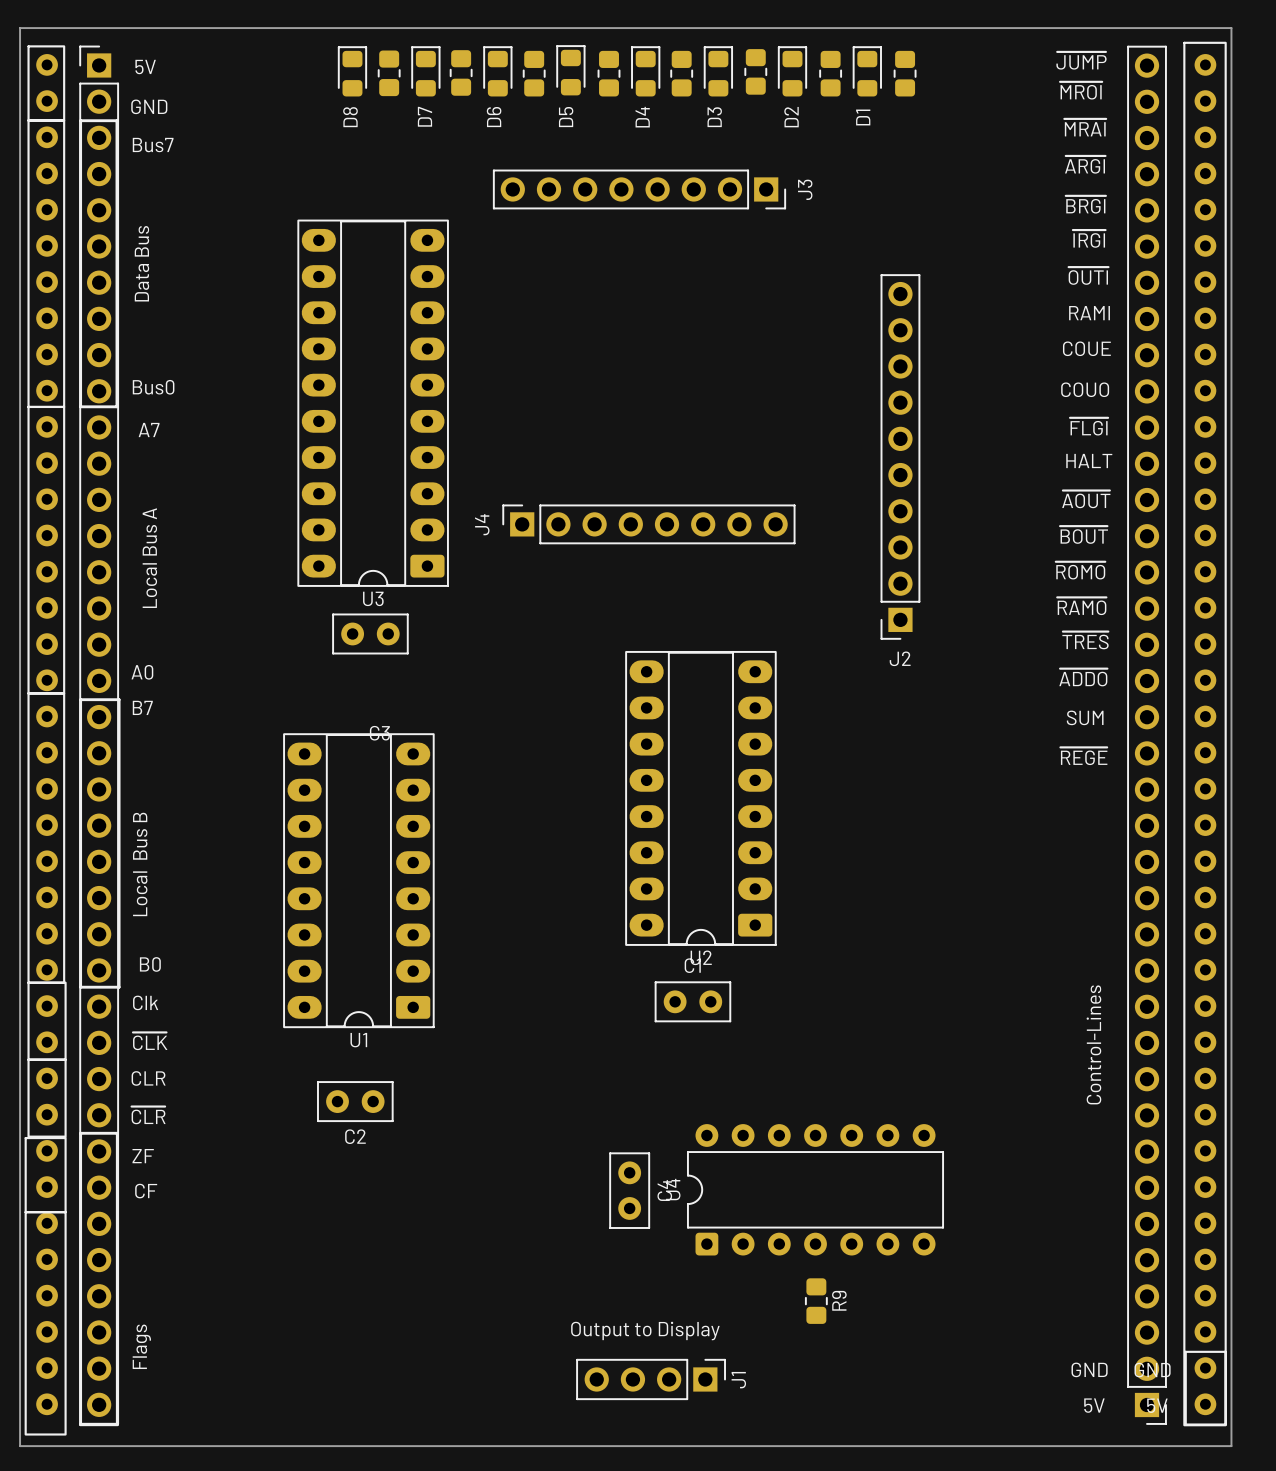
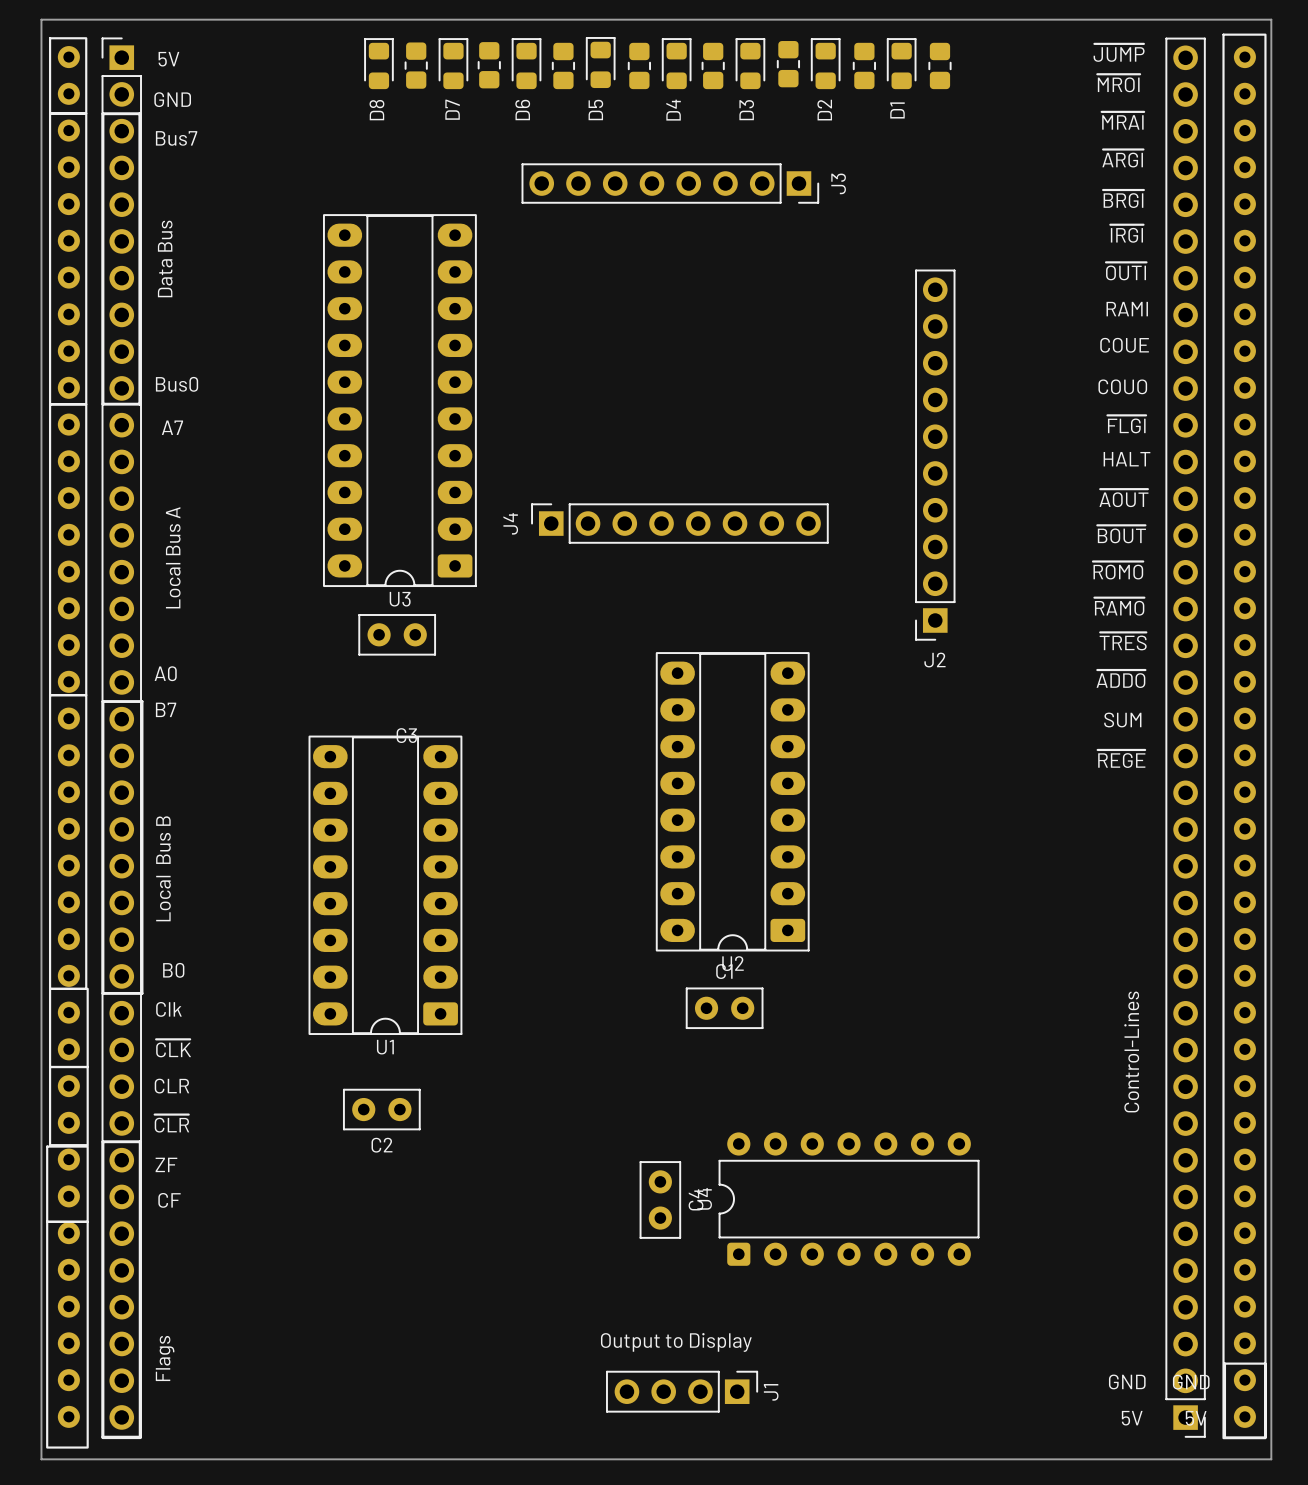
R9: (816, 1301) -> none

